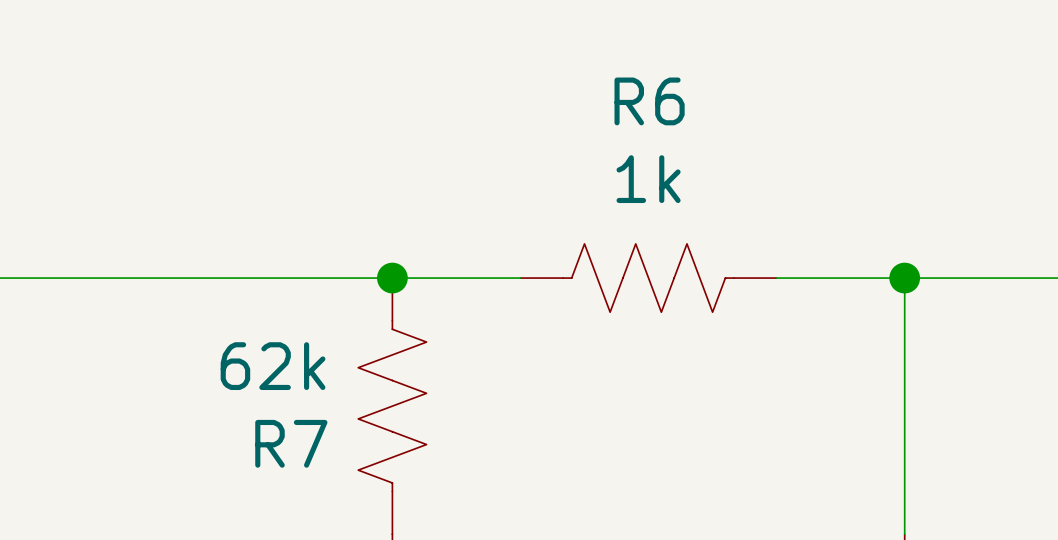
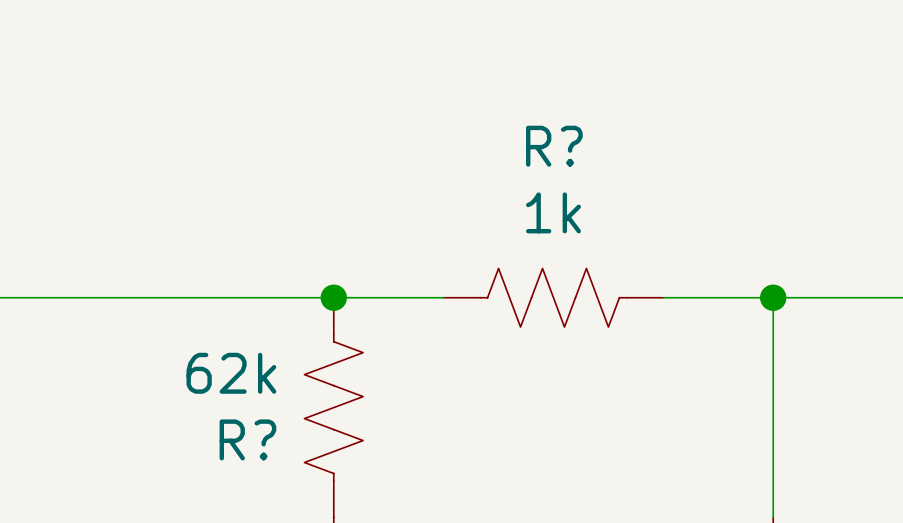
R6 name: R6 (649, 101) -> R? (554, 146)
R7 name: R7 (291, 443) -> R? (247, 439)

